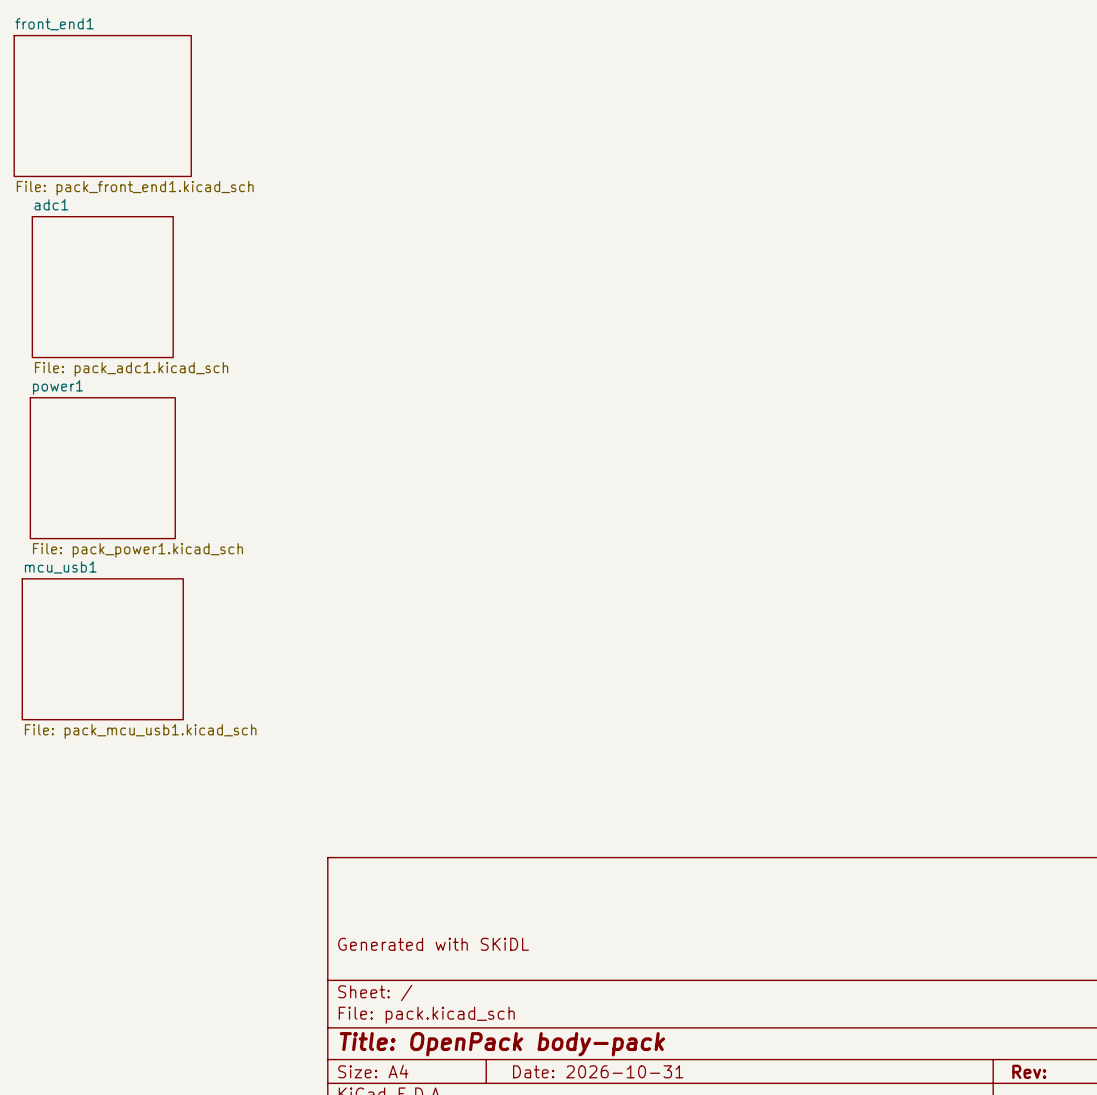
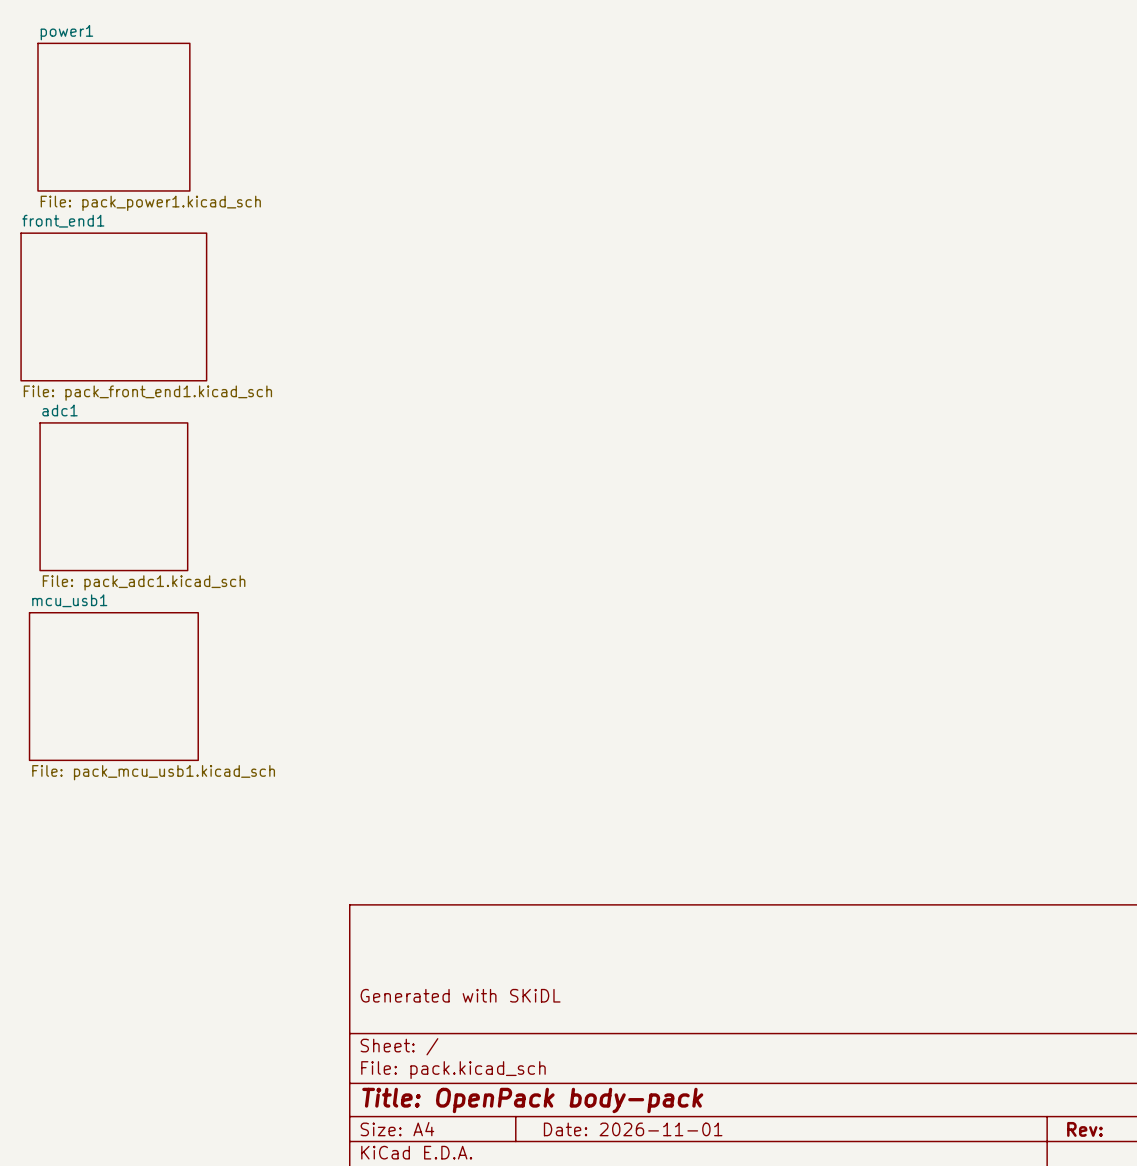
sheet front_end1 position: (102, 106) -> (113, 306)
sheet adc1 position: (102, 287) -> (113, 496)
sheet power1 position: (102, 468) -> (113, 117)
title block: Date: 2026-10-31 (598, 1071) -> Date: 2026-11-01 (633, 1129)

